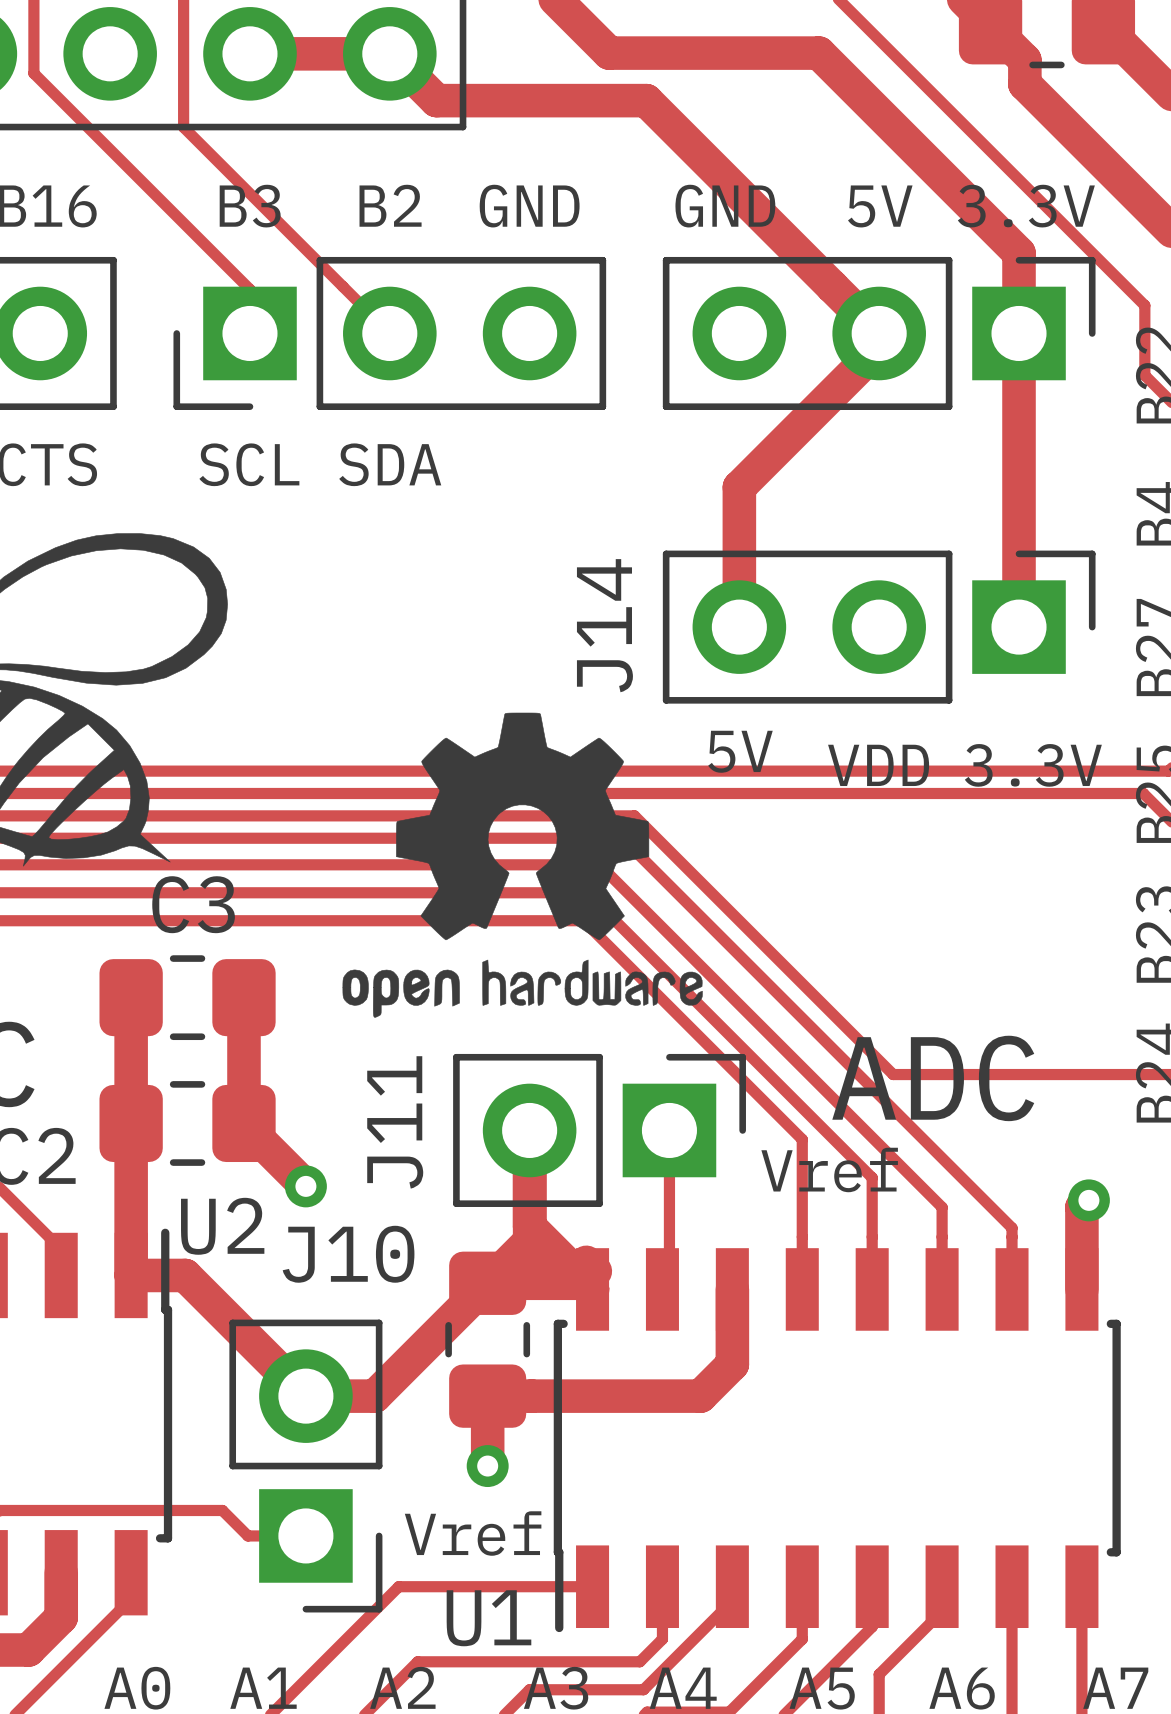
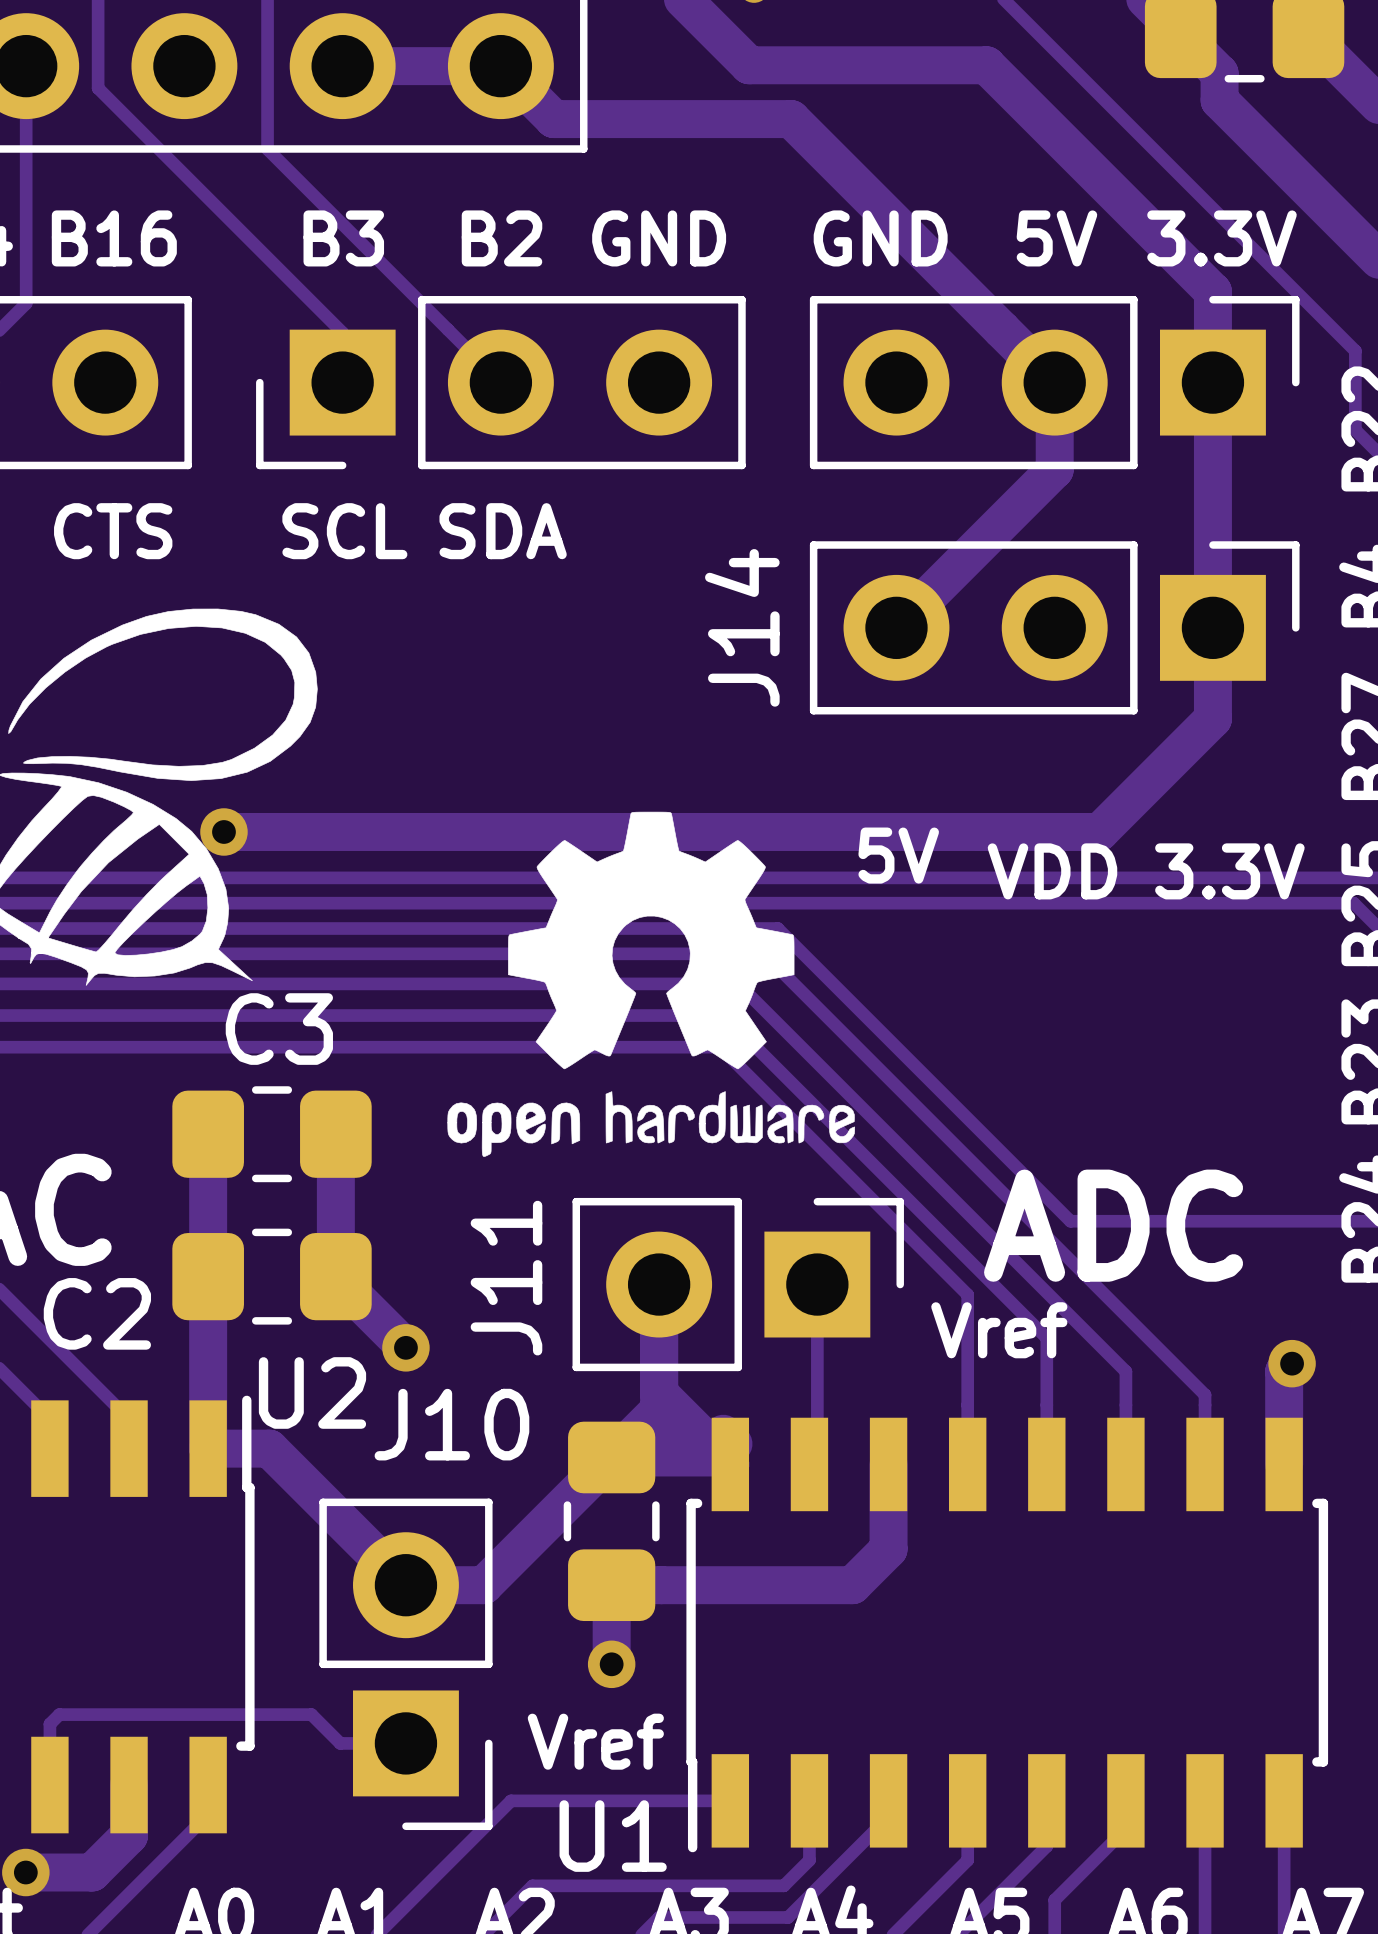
track: none -> (1054, 382) (1054, 469) (896, 627)
track: (886, 340) (739, 487) (739, 627) -> none
J14 position: (879, 627) -> (1054, 627)
track: none -> (1212, 714) (1212, 718) (1099, 831) (223, 831)
via: none -> (223, 831)

